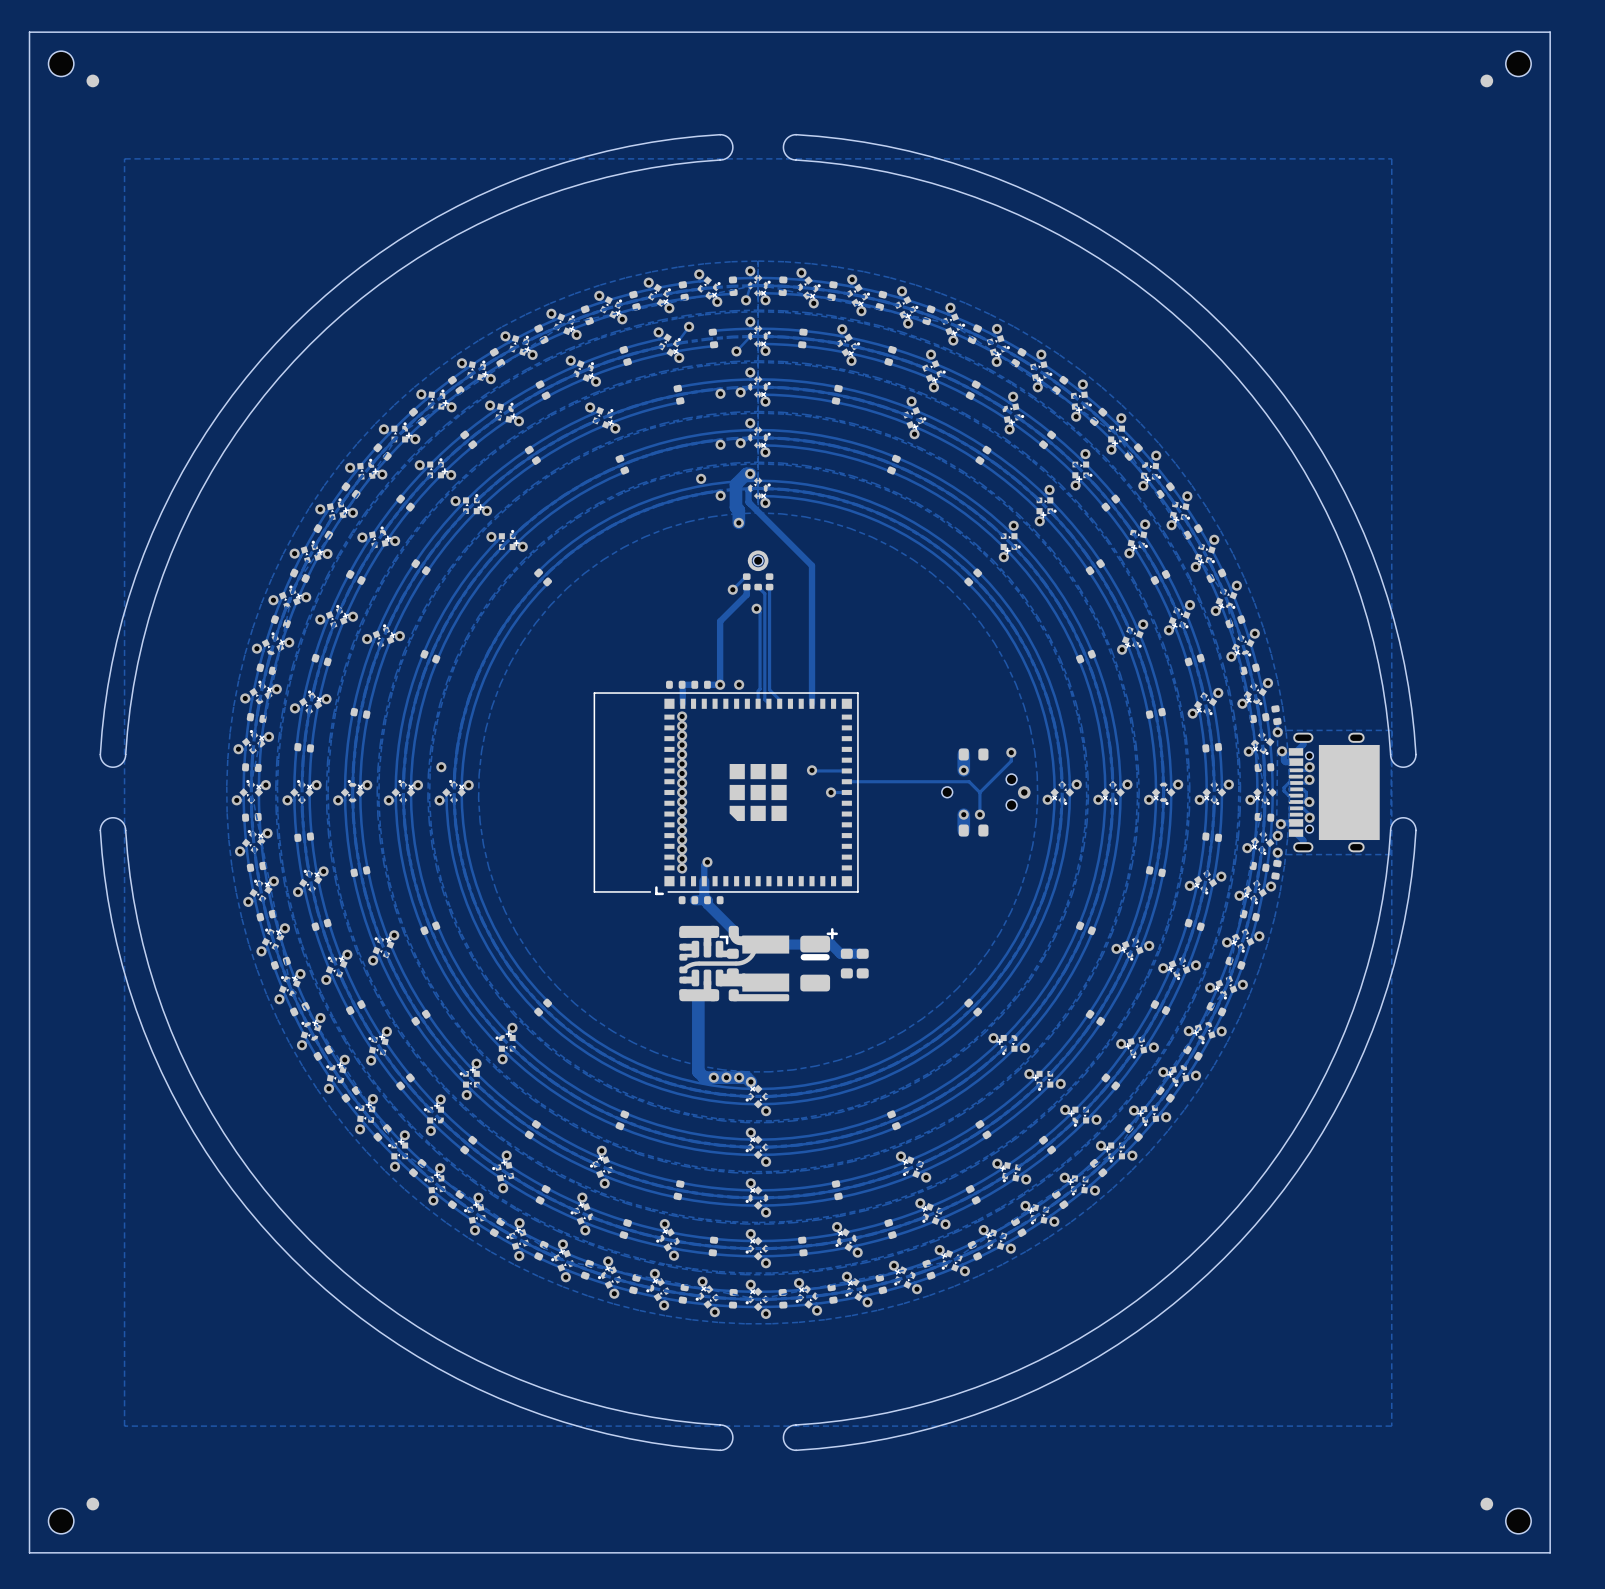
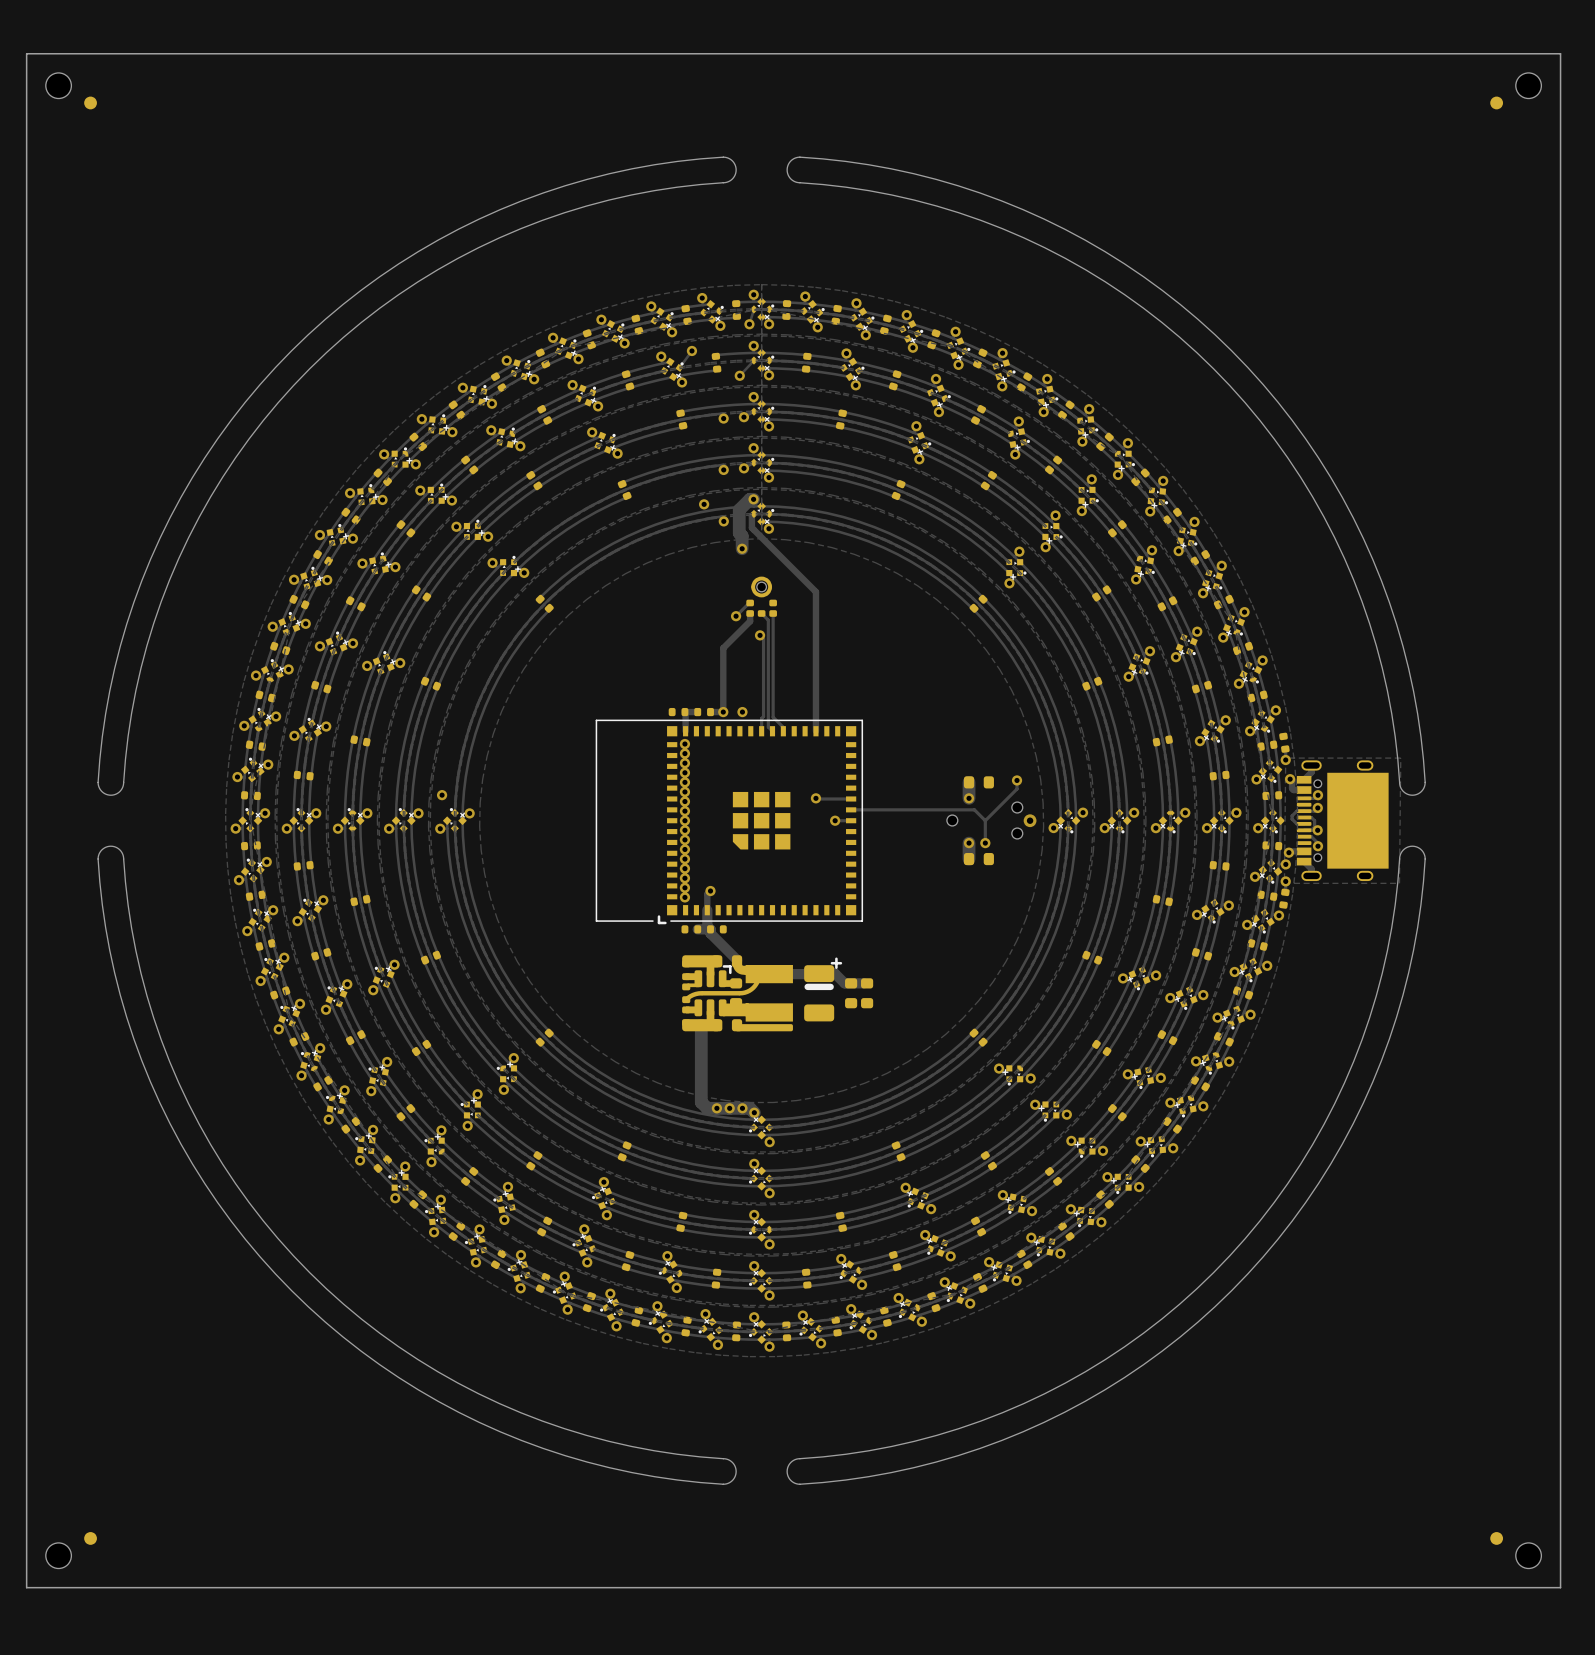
zone outline: (124, 158) (1391, 158) (1391, 1426) (124, 1426) (124, 158) -> none

